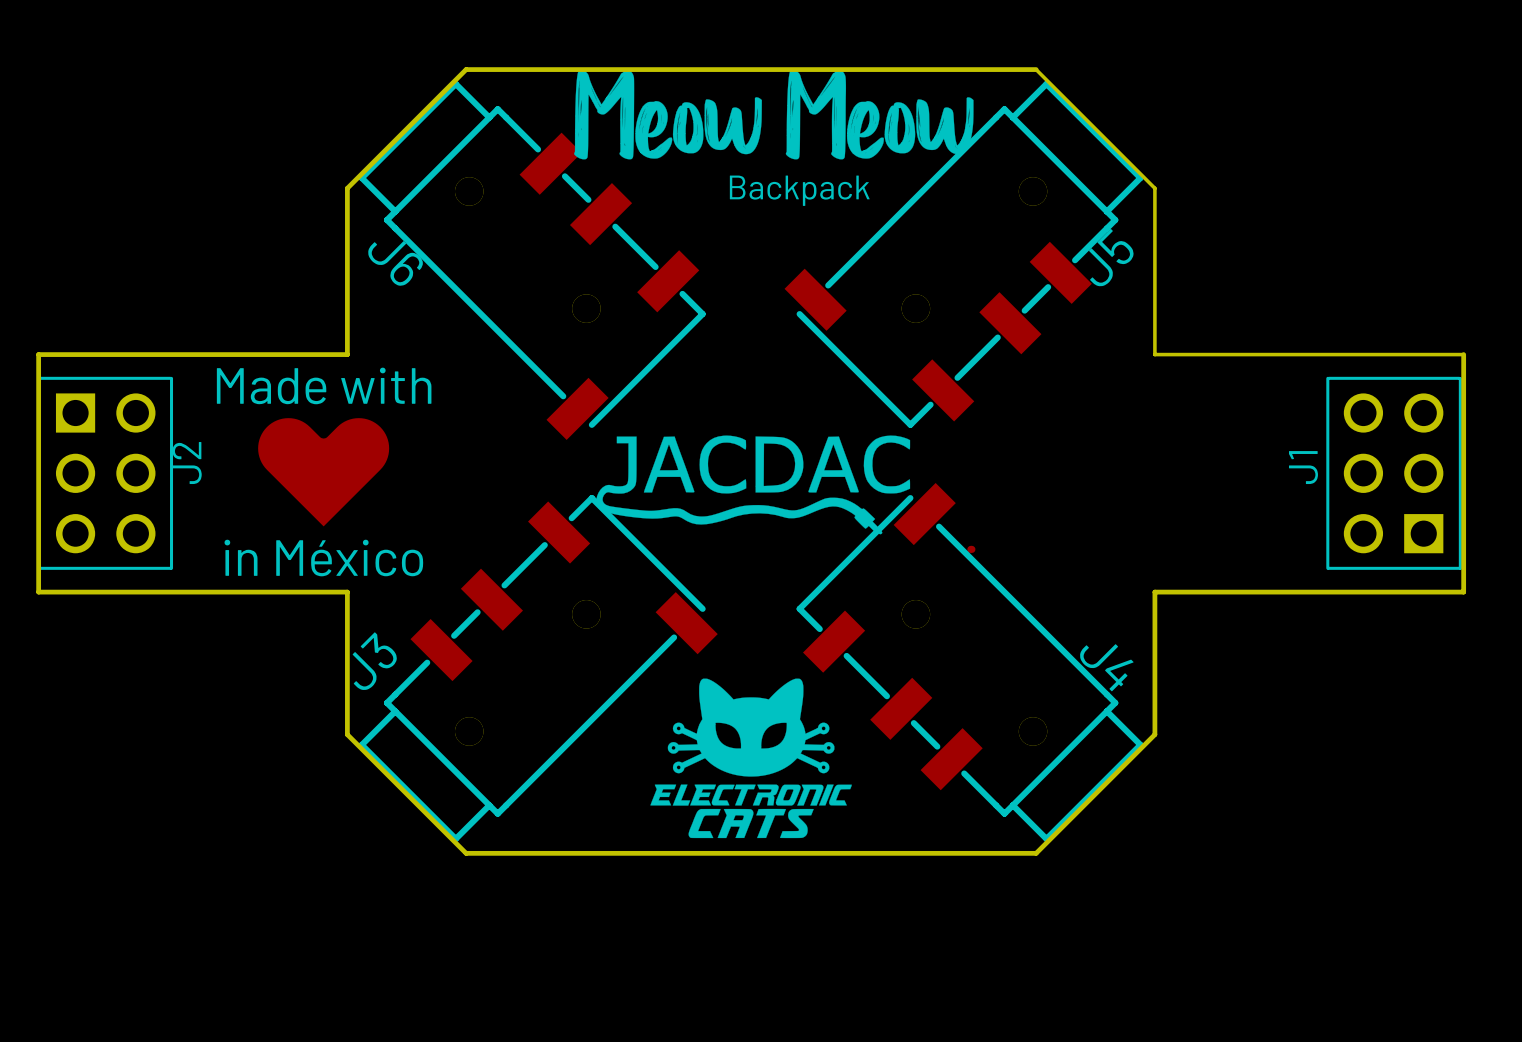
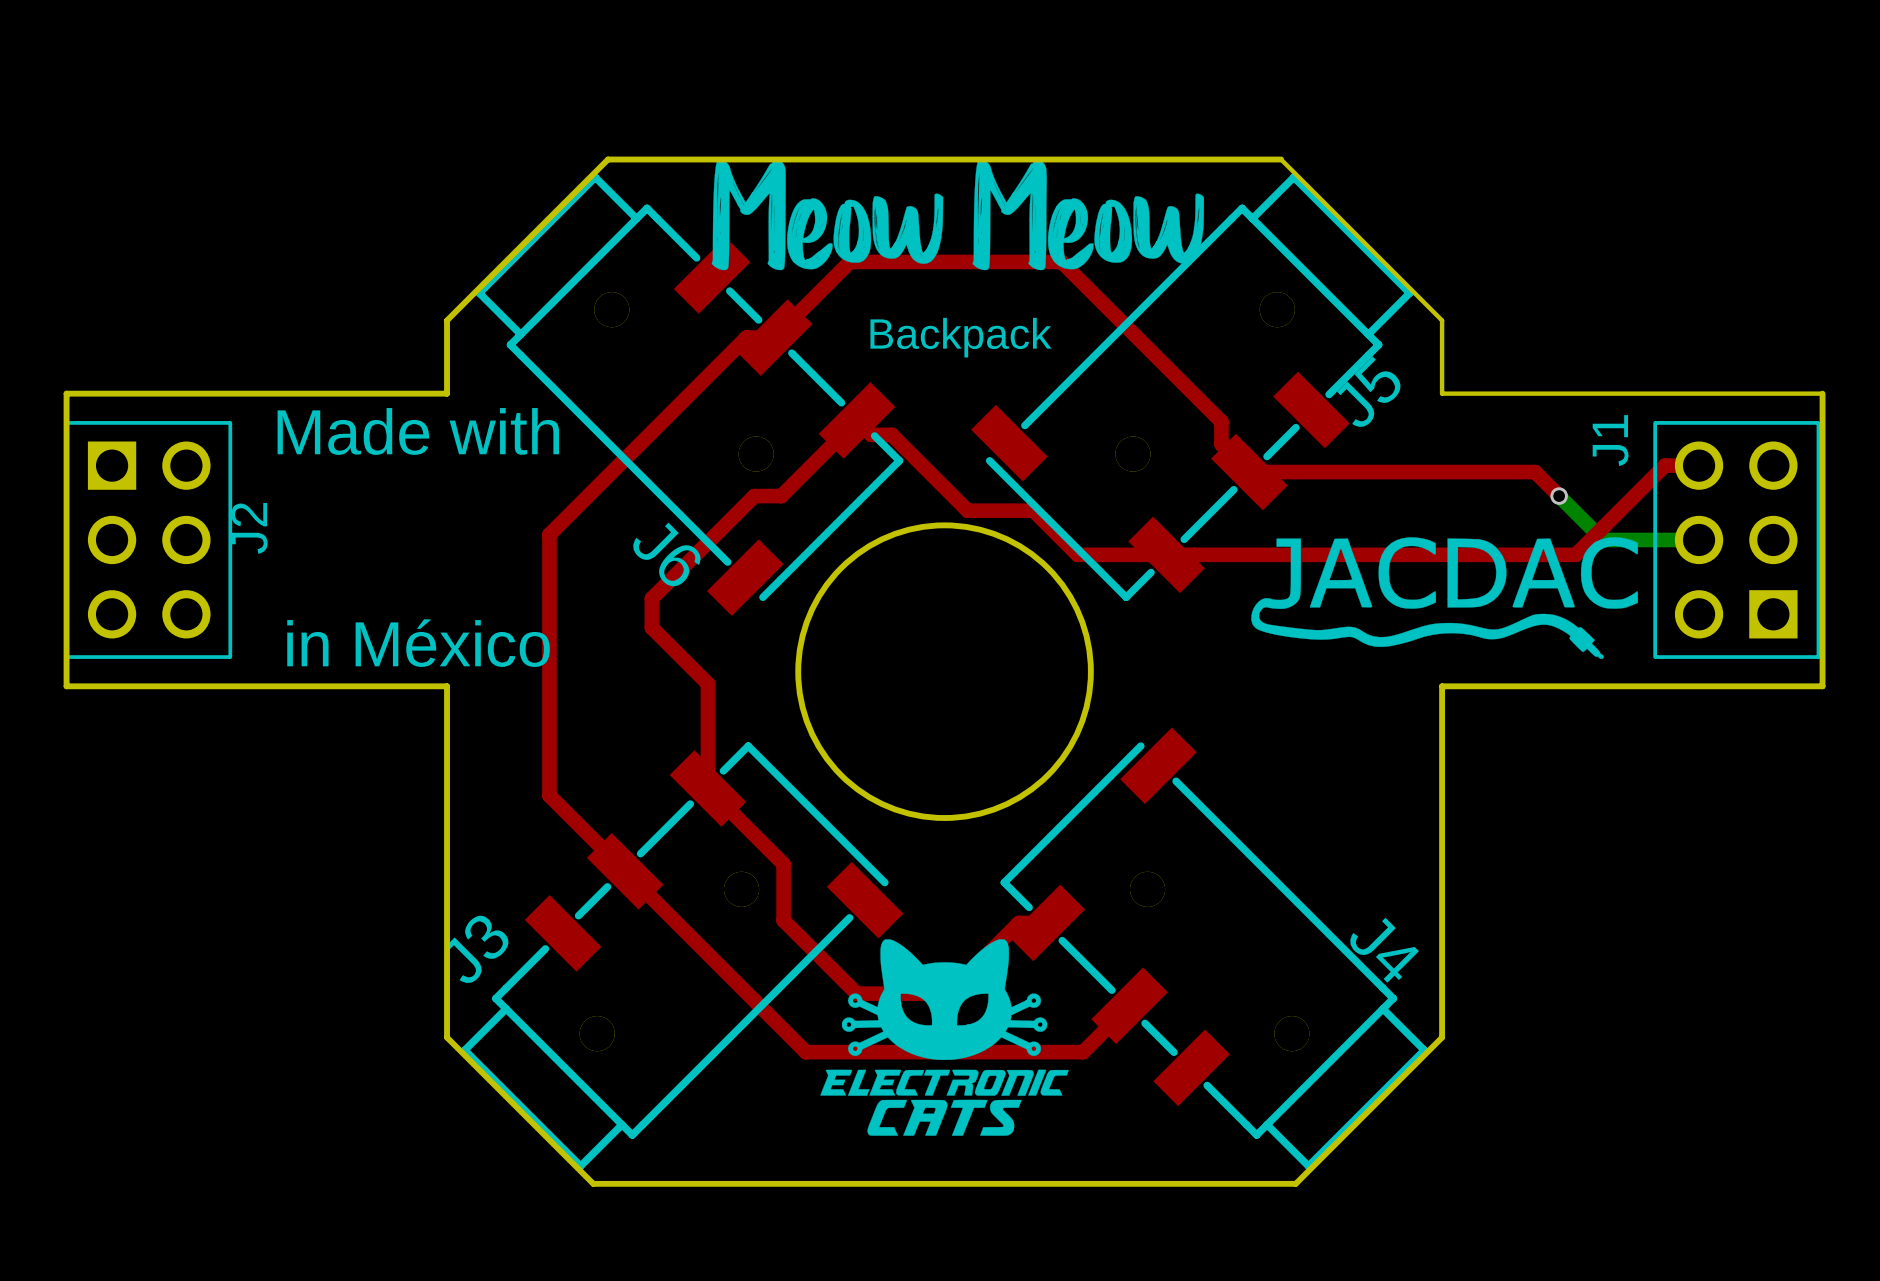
drawing position: (773, 114) -> (957, 215)
text position: Backpack (799, 190) -> Backpack (960, 337)
J5 position: (964, 254) -> (1192, 387)
J6 position: (532, 260) -> (689, 394)
J6 name position: J6 (395, 263) -> J6 (666, 554)
board edge: (347, 295) (347, 188) (466, 69) (1036, 69) (1154, 188) (1154, 295) -> (447, 320) (607, 159) (1281, 159) (1442, 320)
top track: none -> (1699, 465) (1664, 465) (1575, 554) (1077, 554) (1033, 510) (967, 510) (891, 434) (871, 434) (856, 420) (781, 496) (754, 496) (651, 598) (651, 627) (707, 683) (707, 788) (783, 864) (783, 920) (856, 993) (948, 993) (1019, 922) (1046, 922)
drawing: [258, 418, 390, 527] -> none
top track: none -> (1559, 496) (1535, 472) (1249, 472) (1221, 444) (1221, 421) (1061, 261) (849, 261) (774, 337) (746, 337) (549, 534) (549, 795) (805, 1052) (1083, 1052) (1129, 1005)
bottom track: none -> (1559, 496) (1603, 539) (1699, 539)
via: none -> (1559, 496)
round board edge: none -> [795, 522, 1094, 821]
J1 name position: J1 (1303, 467) -> J1 (1610, 440)
drawing position: (753, 484) -> (1444, 598)
top track: (970, 549) (971, 549) -> none
J4 position: (970, 662) -> (1214, 948)
J3 position: (538, 668) -> (682, 956)
board edge: (347, 734) (466, 853) (1036, 853) (1154, 734) -> (447, 861) (447, 1037) (593, 1183) (1295, 1183) (1442, 1037) (1442, 861)
drawing position: (751, 758) -> (944, 1037)

